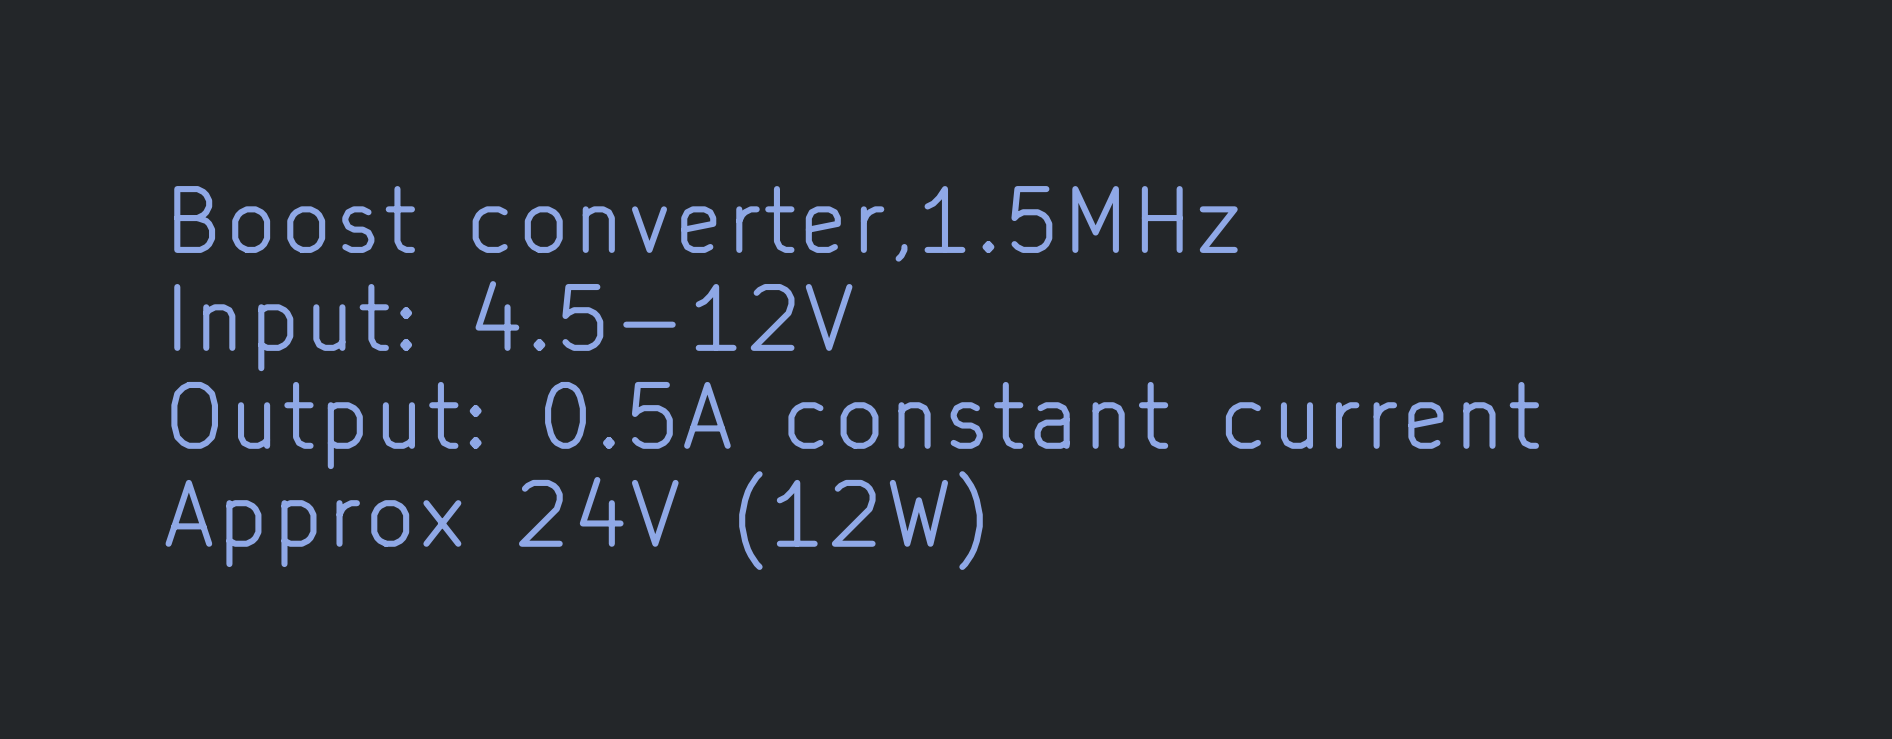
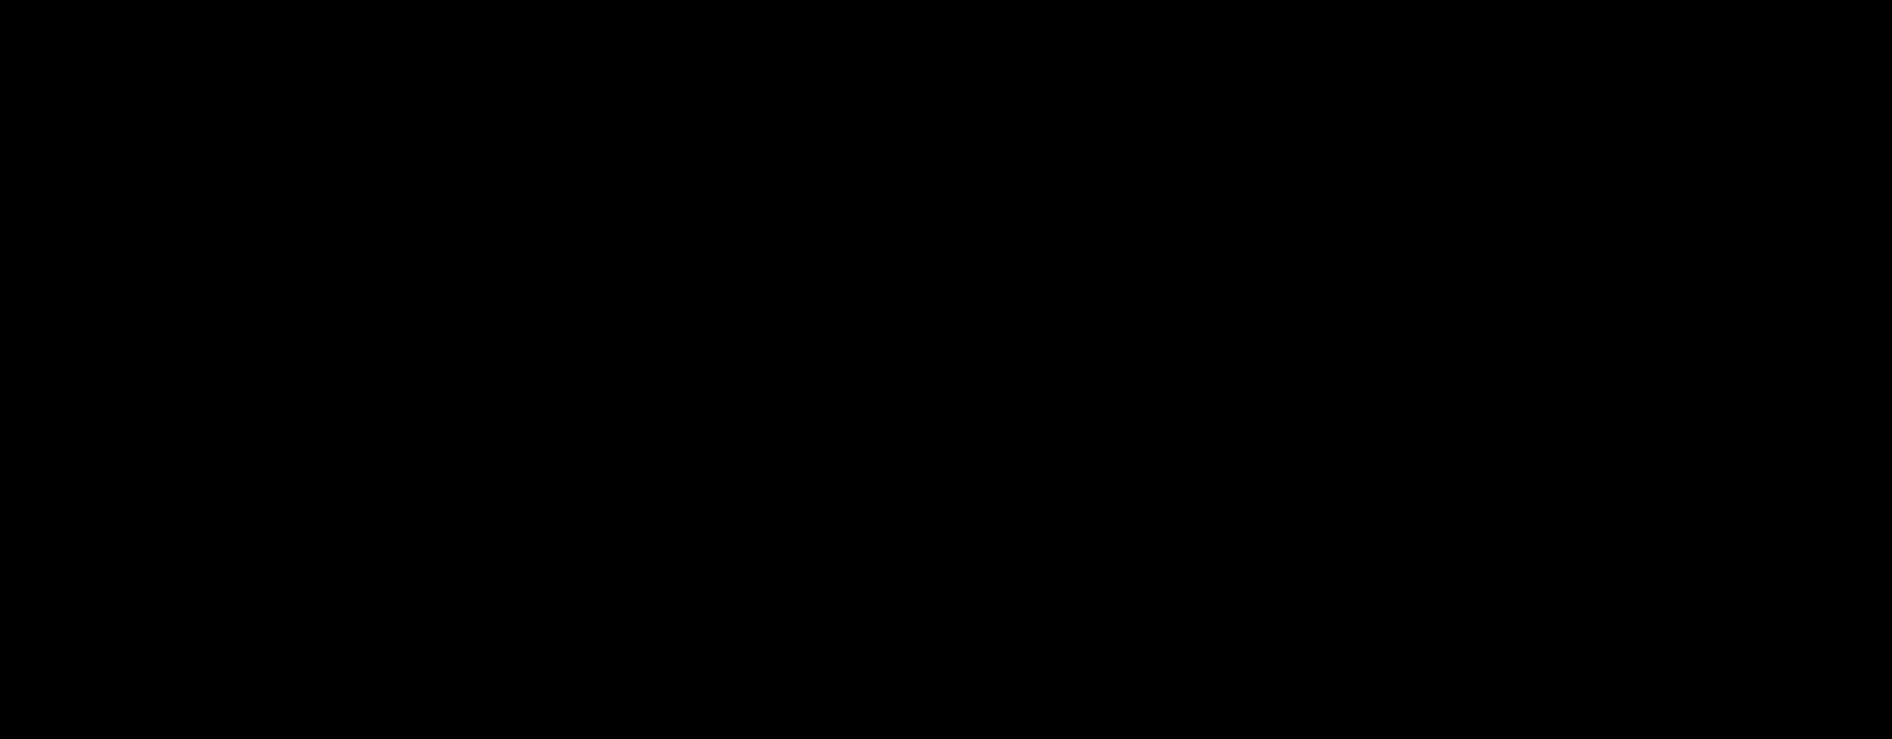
text: Boost converter,1.5MHz (705, 223) -> none
text: Input: 4.5-12V (513, 326) -> none
text: Output: 0.5A constant current (855, 425) -> none
text: Approx 24V (12W) (574, 520) -> none

